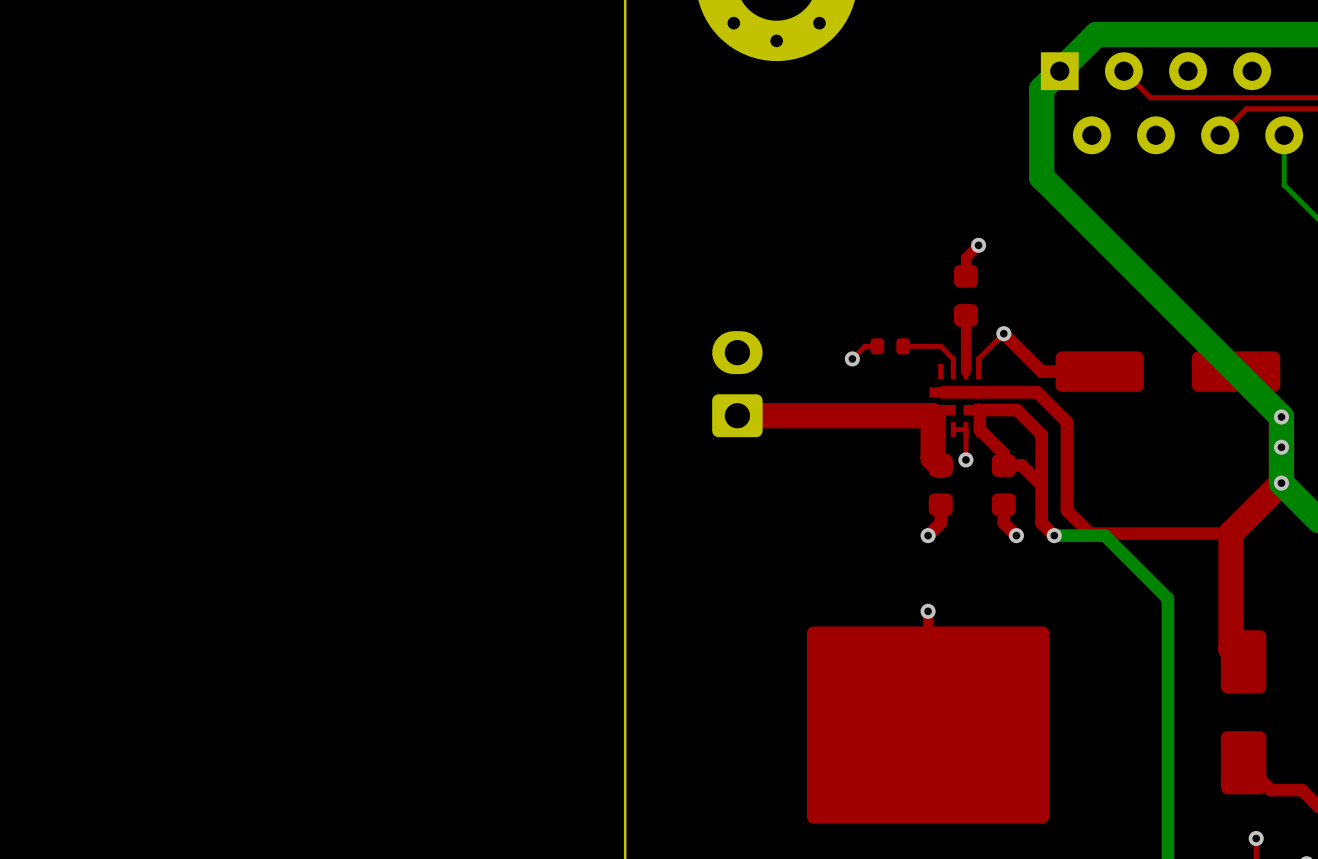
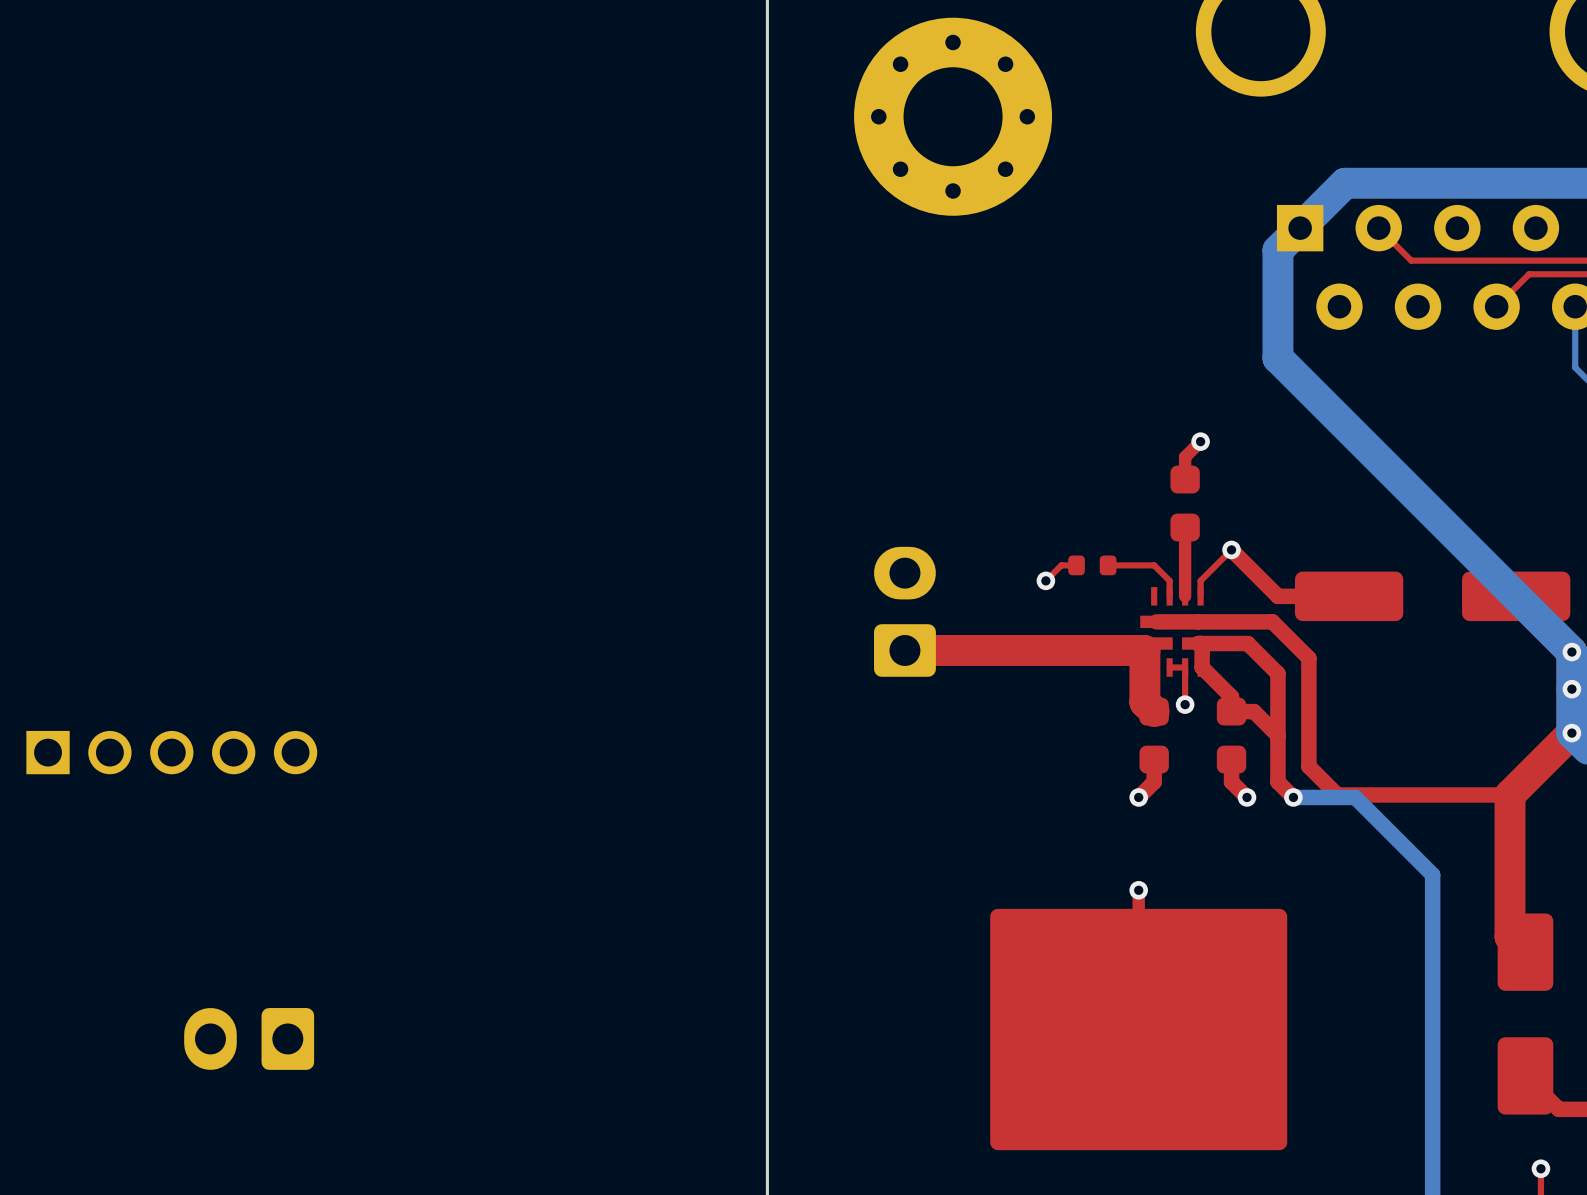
part: none -> (171, 752)
part: none -> (249, 1038)

